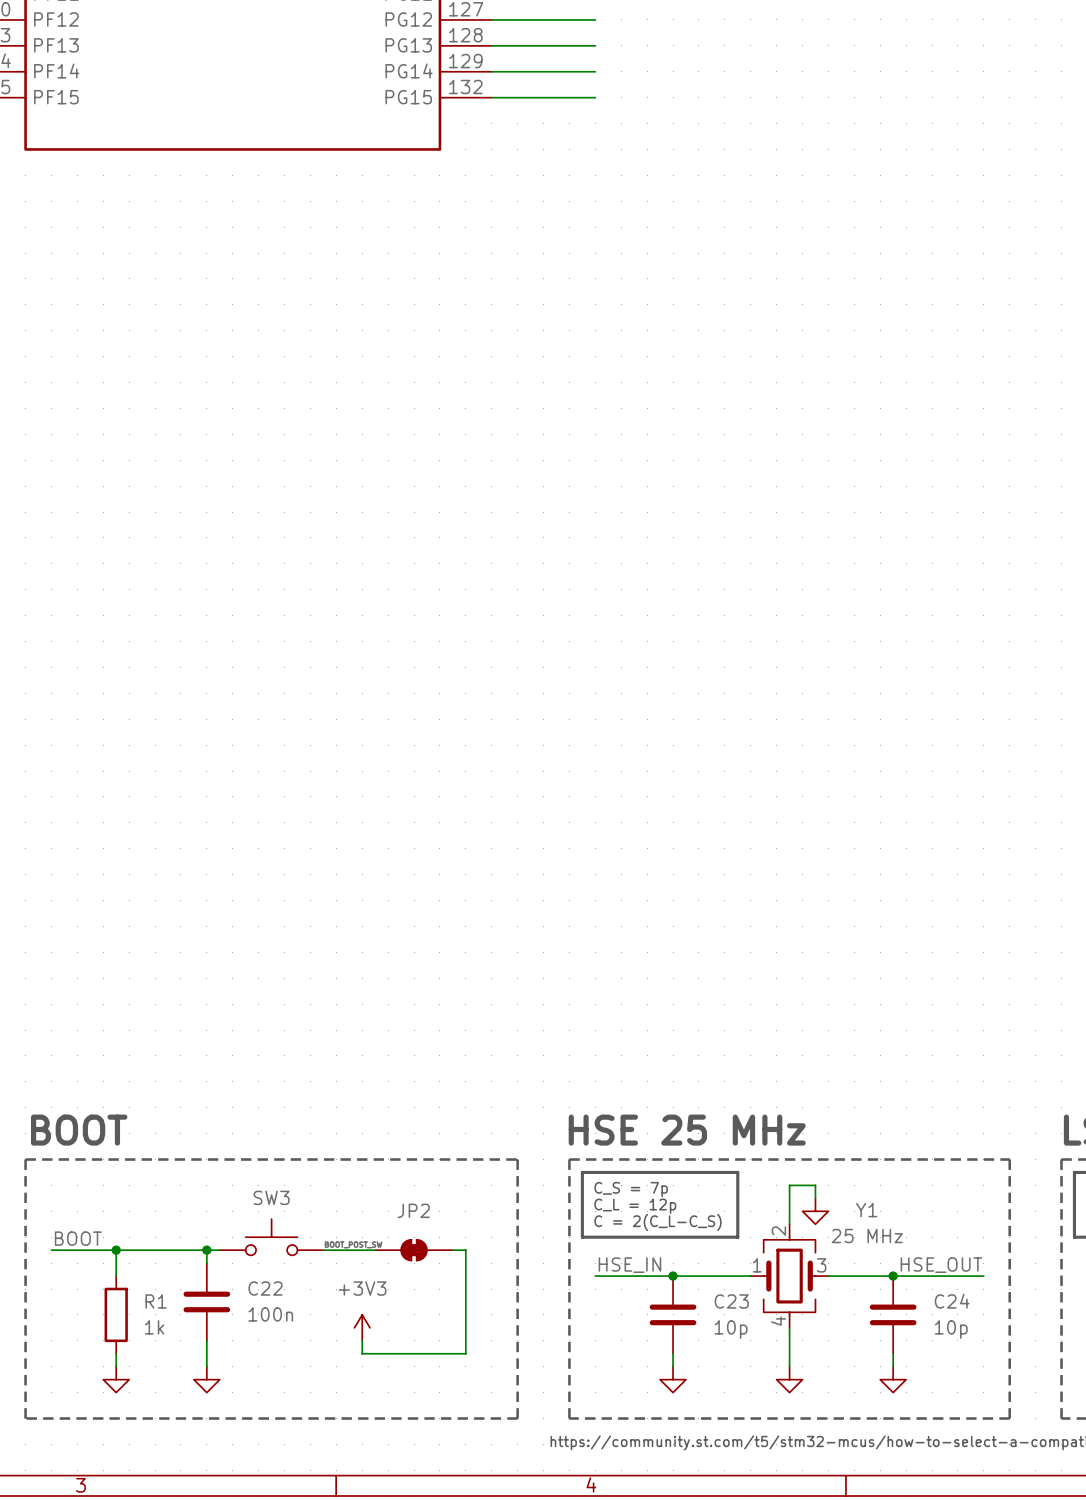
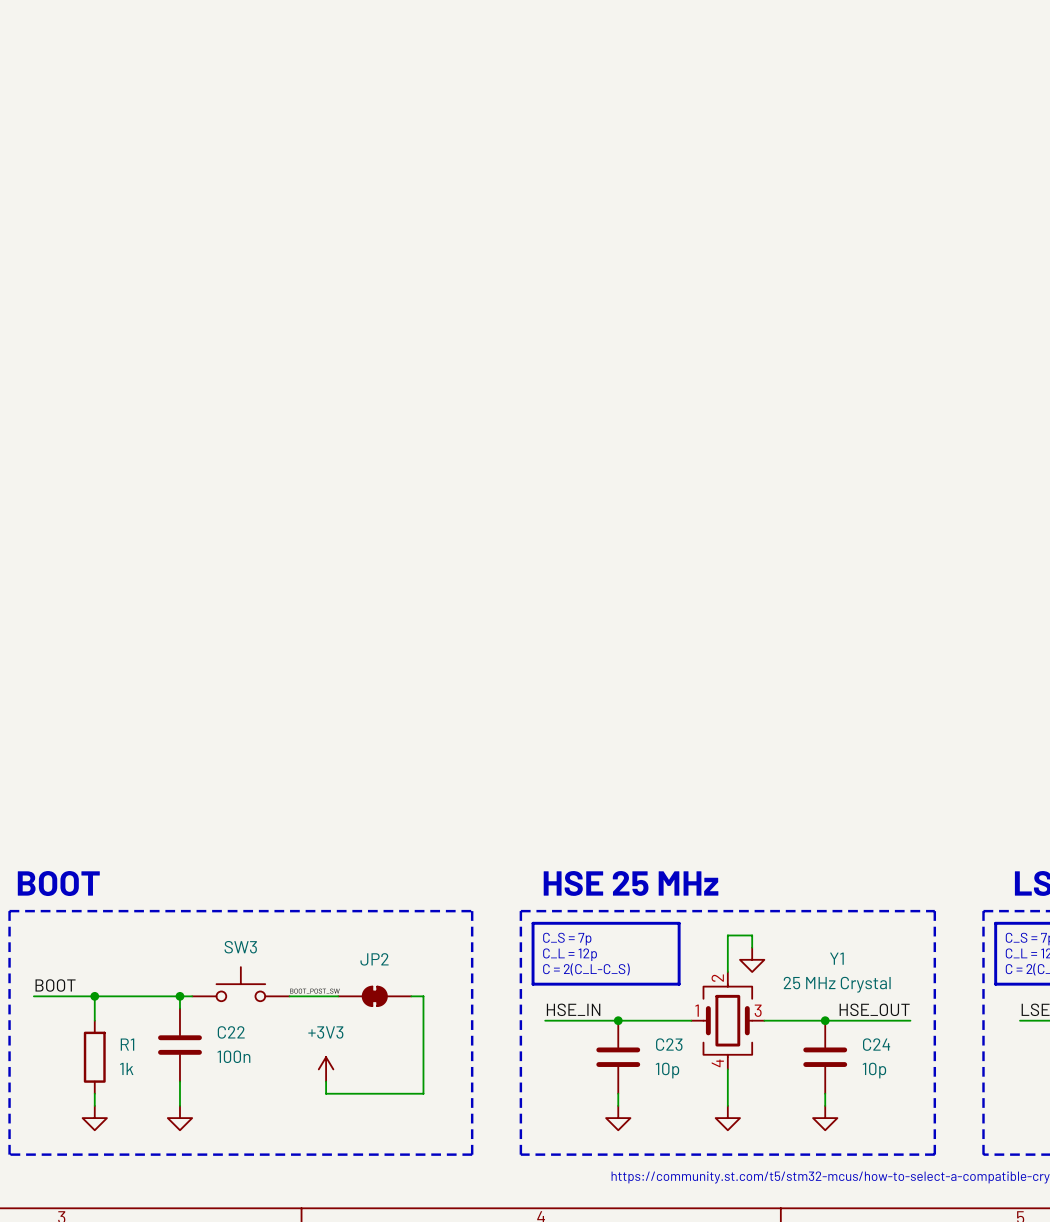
Y1 name position: Y1 (866, 1210) -> Y1 (836, 958)
Y1 value: 25 MHz (867, 1236) -> 25 MHz Crystal (837, 984)

